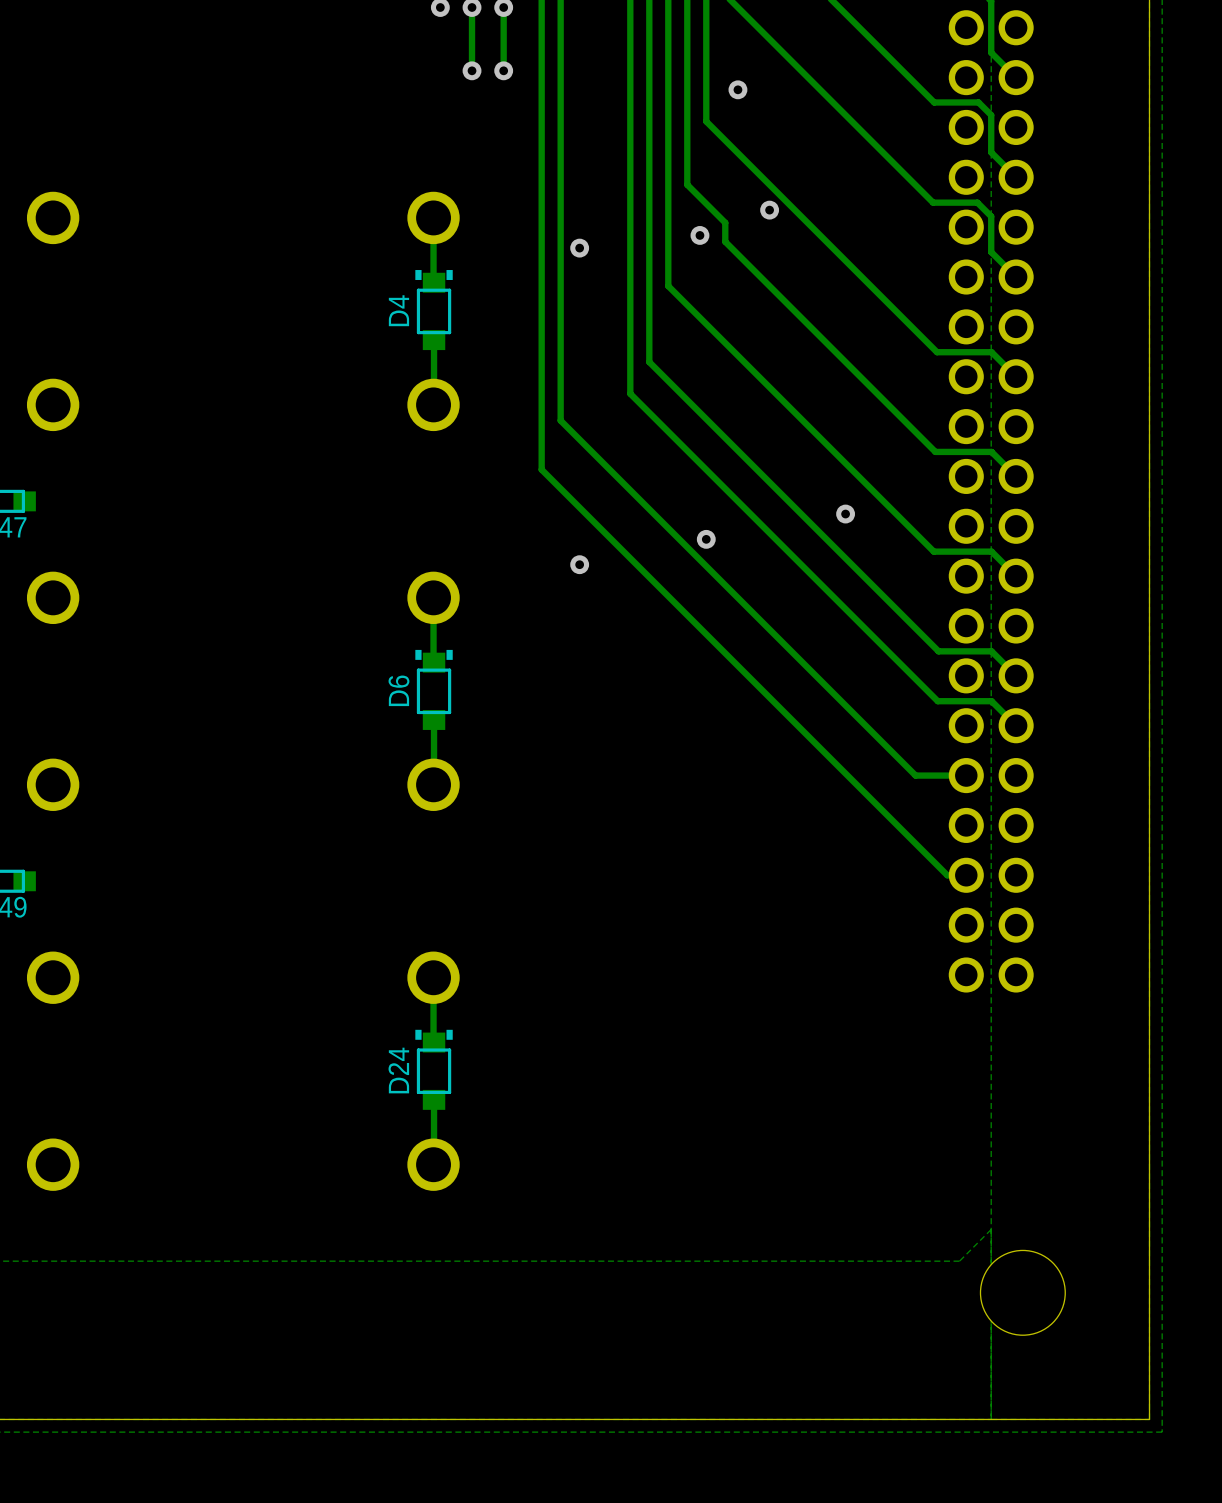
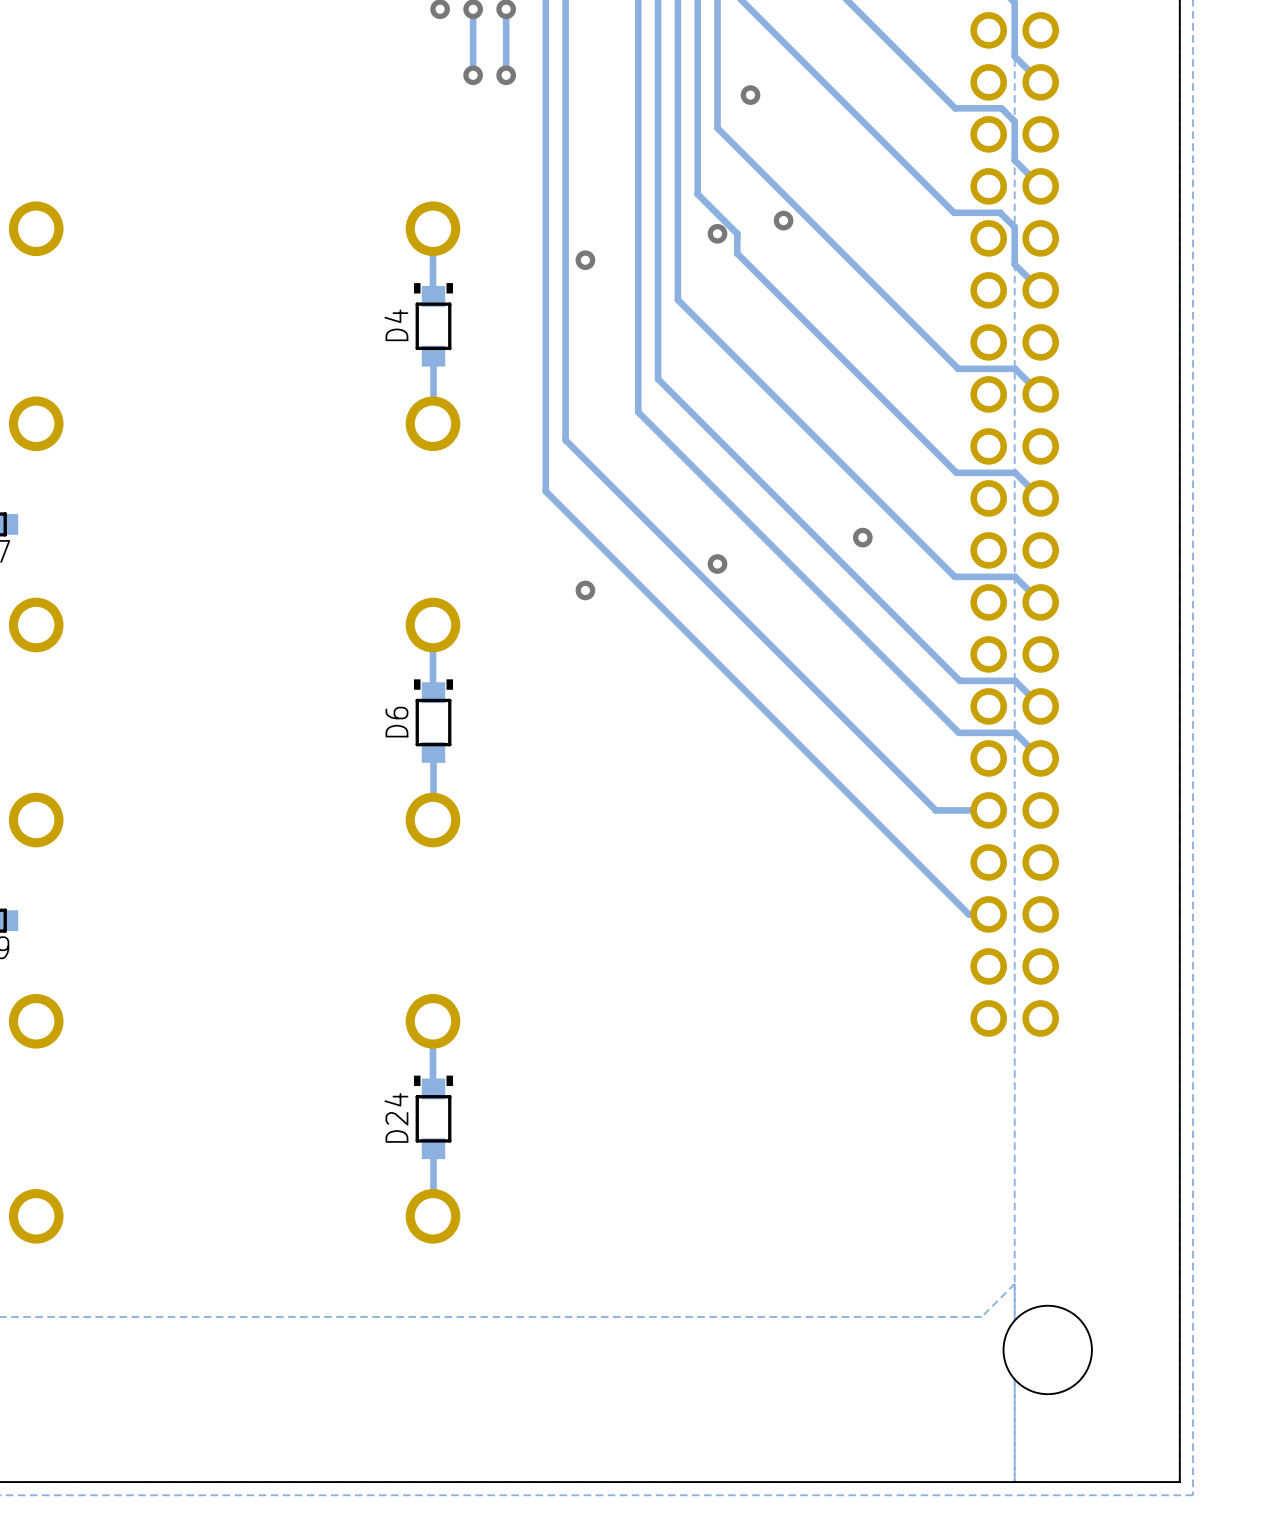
via position: (699, 235) -> (717, 233)

